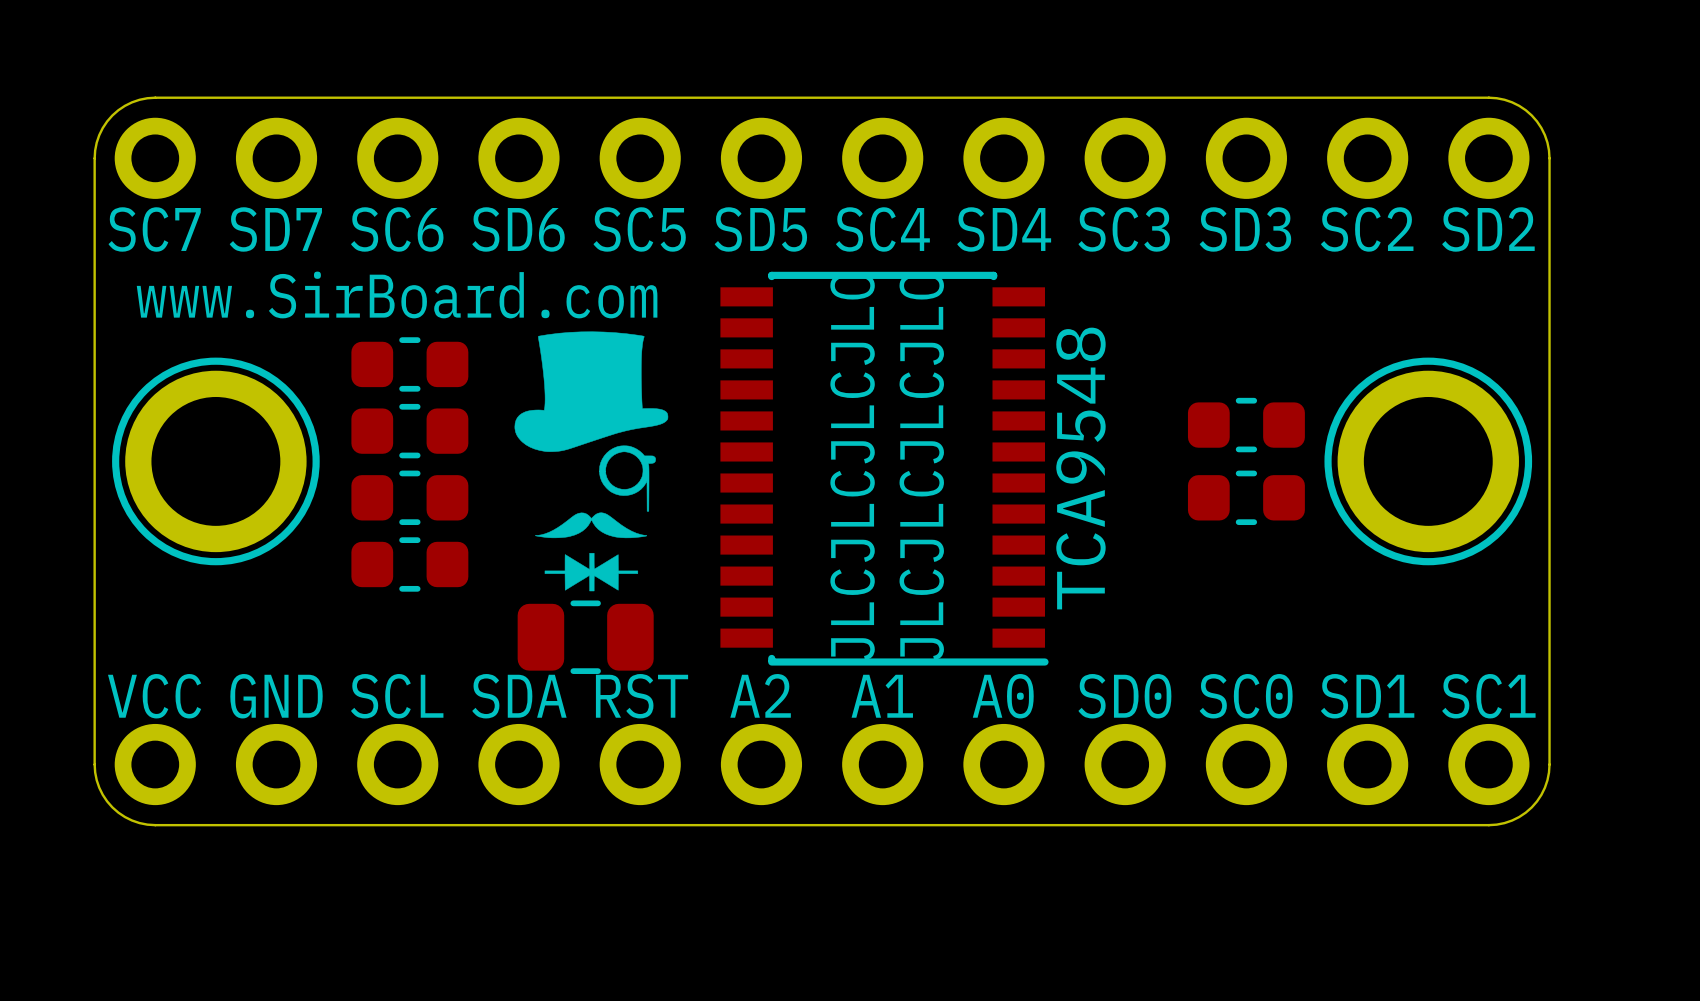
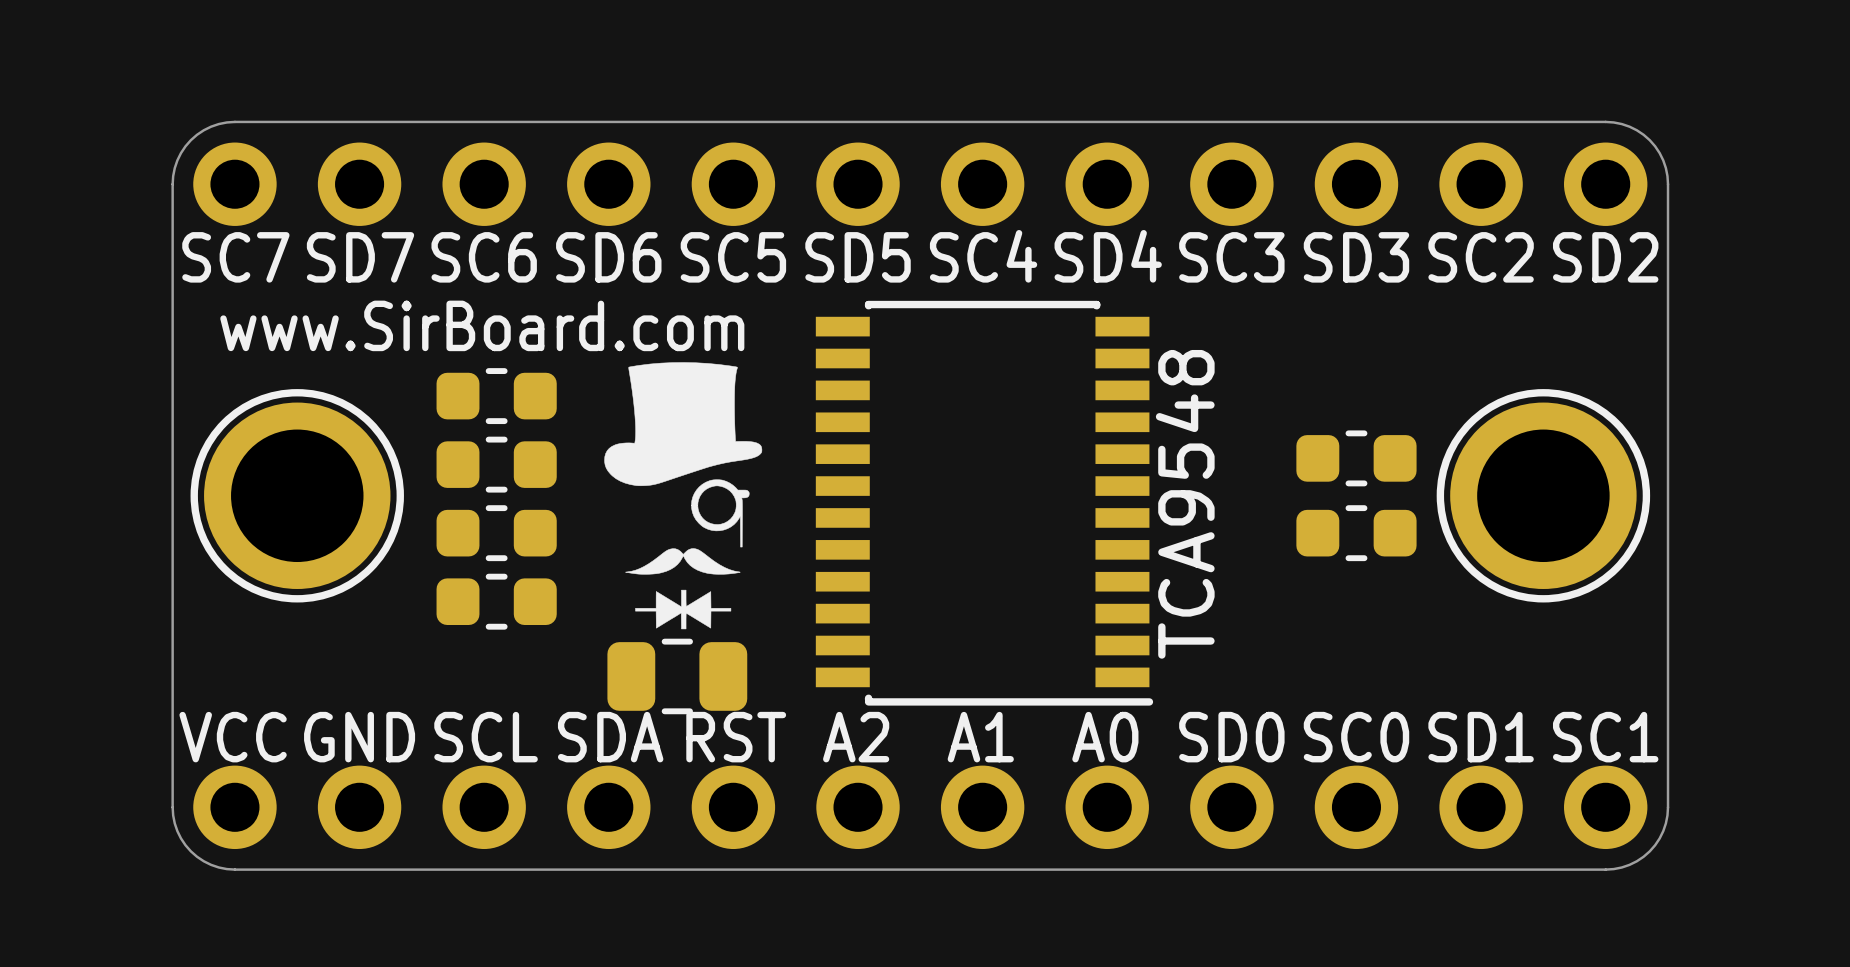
text: JLCJLCJLCJLC (852, 467) -> none
text: JLCJLCJLCJLC (921, 467) -> none

